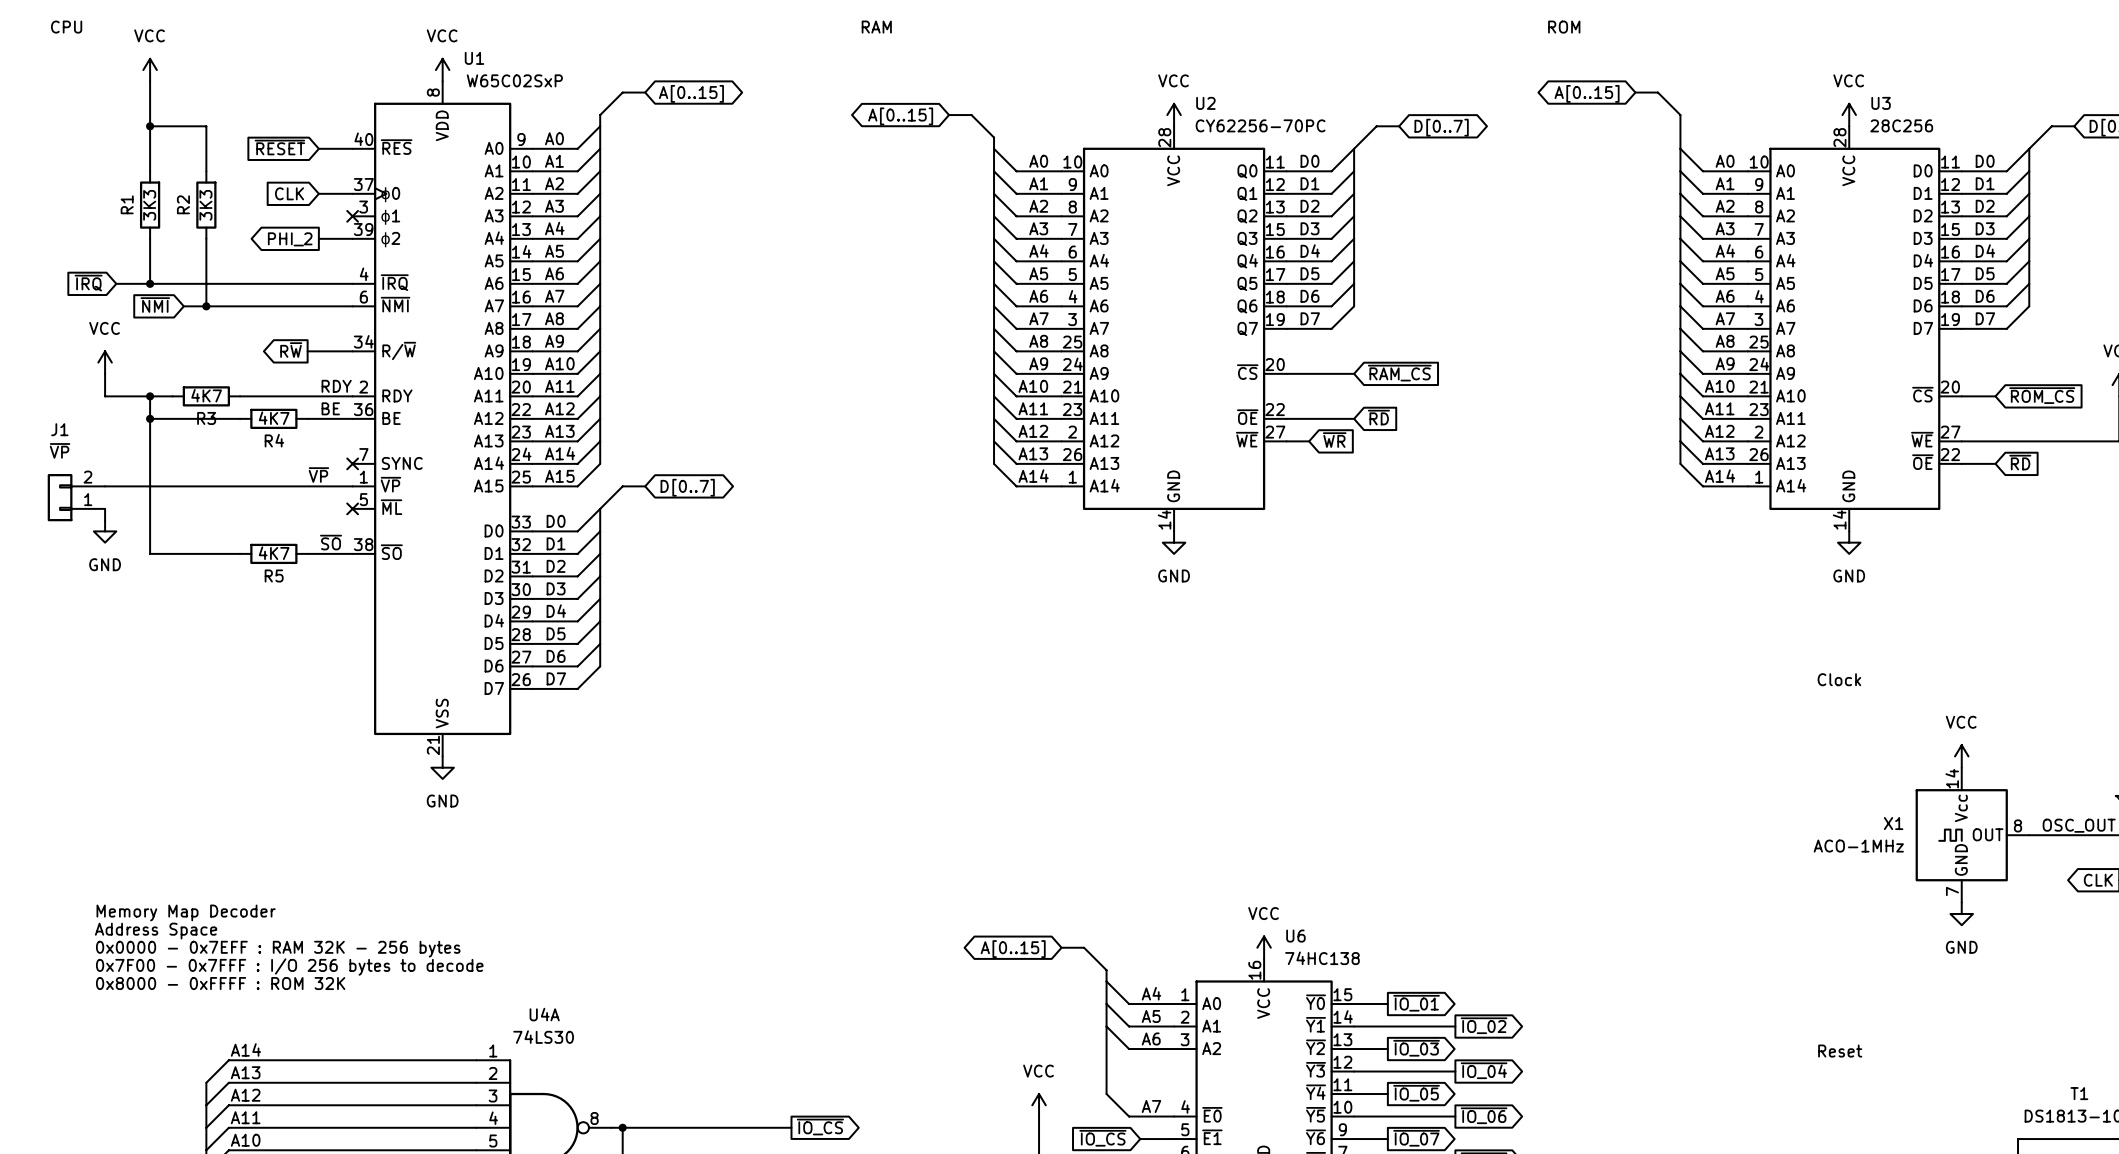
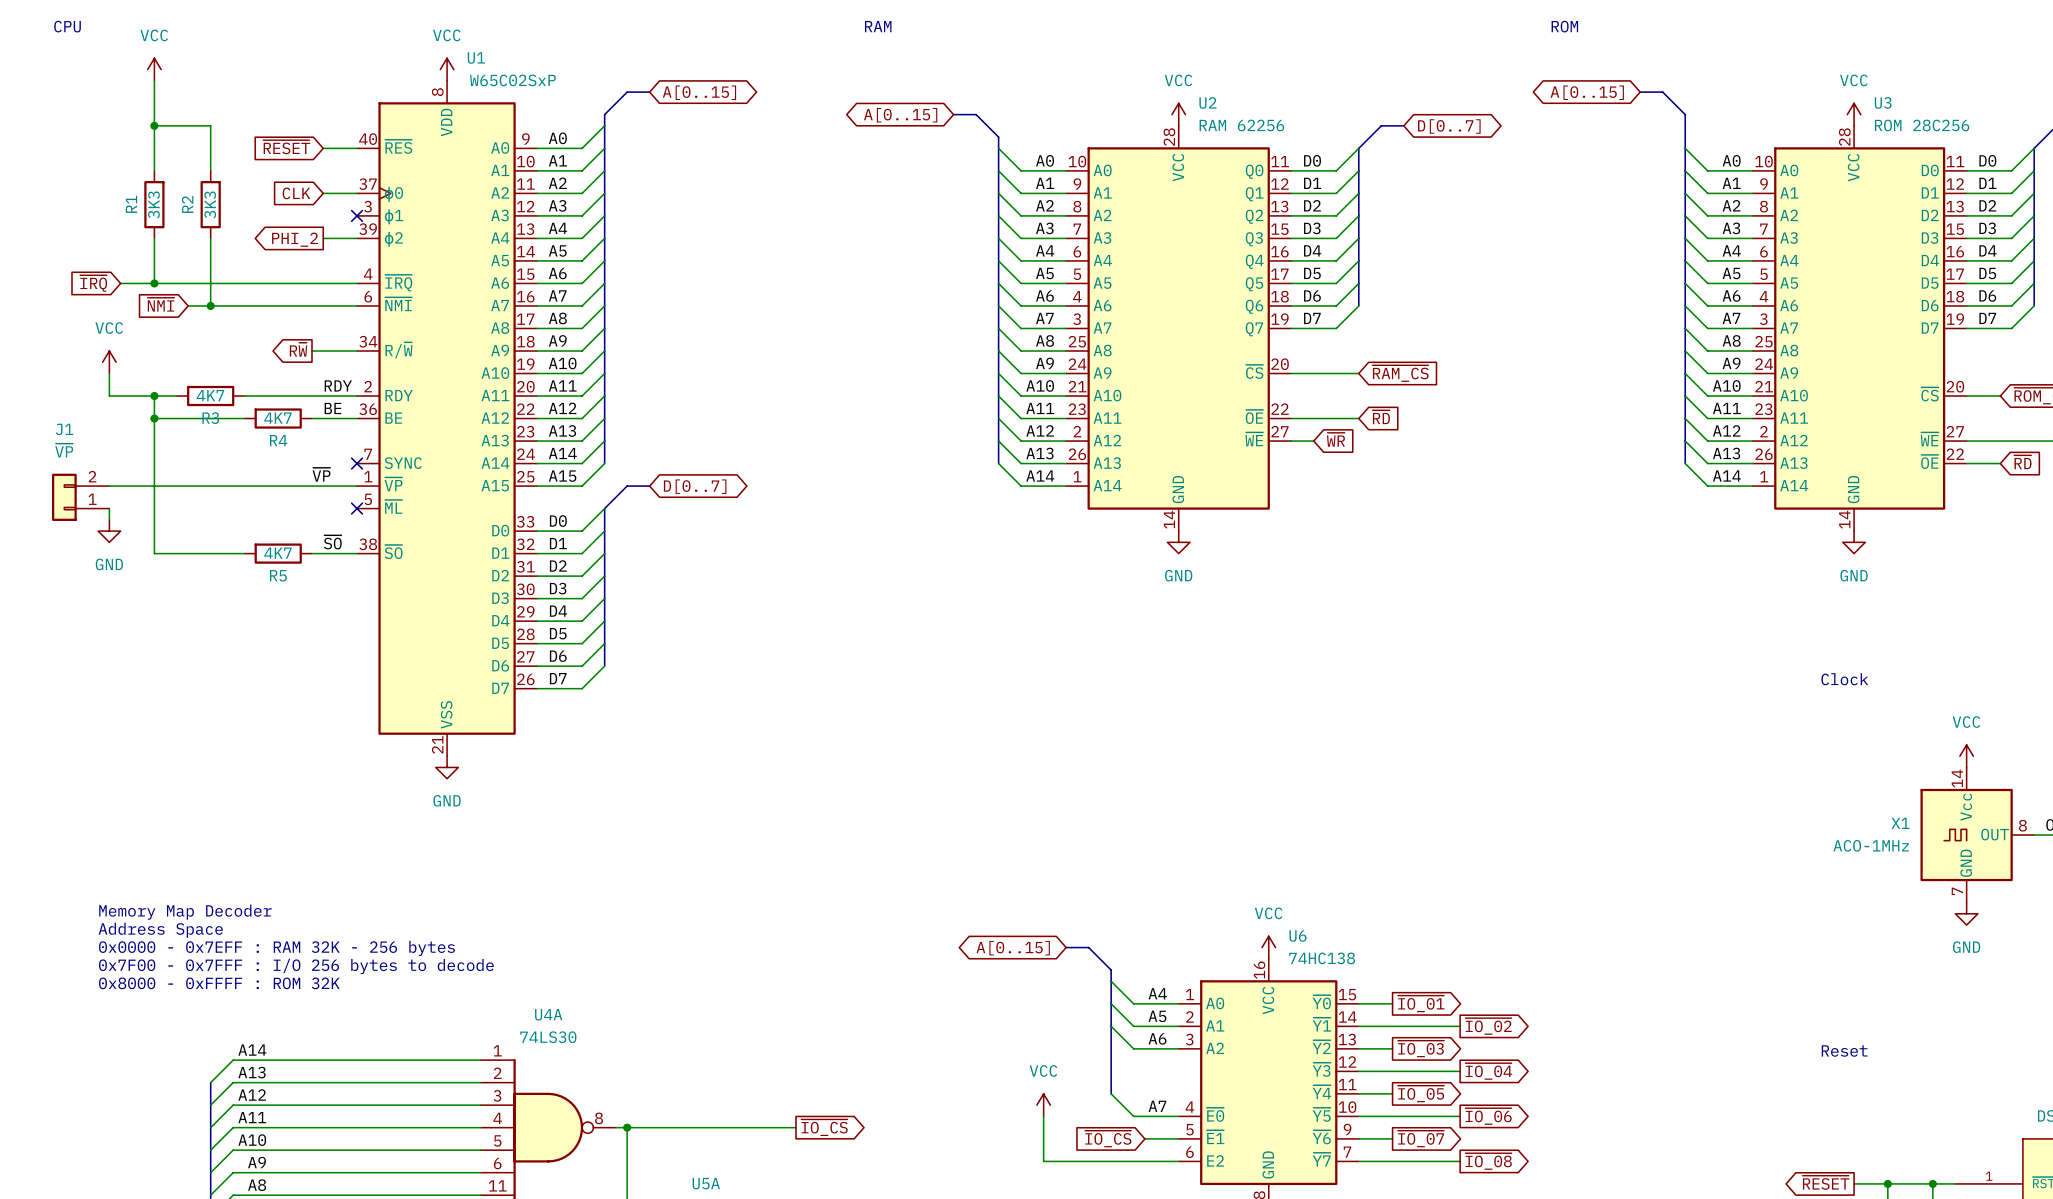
U2 value: CY62256-70PC (1260, 125) -> RAM 62256 (1241, 125)
U3 value: 28C256 (1901, 125) -> ROM 28C256 (1922, 125)

